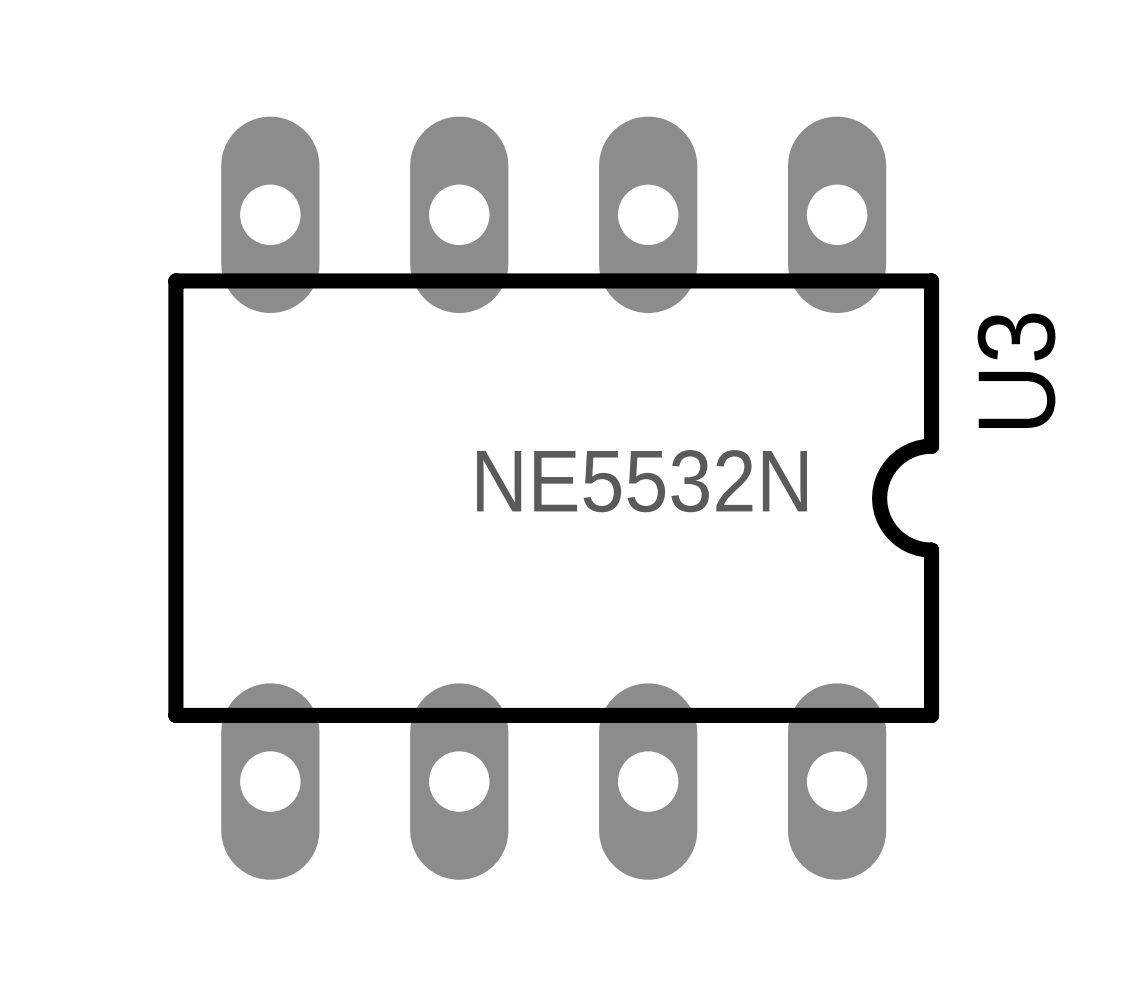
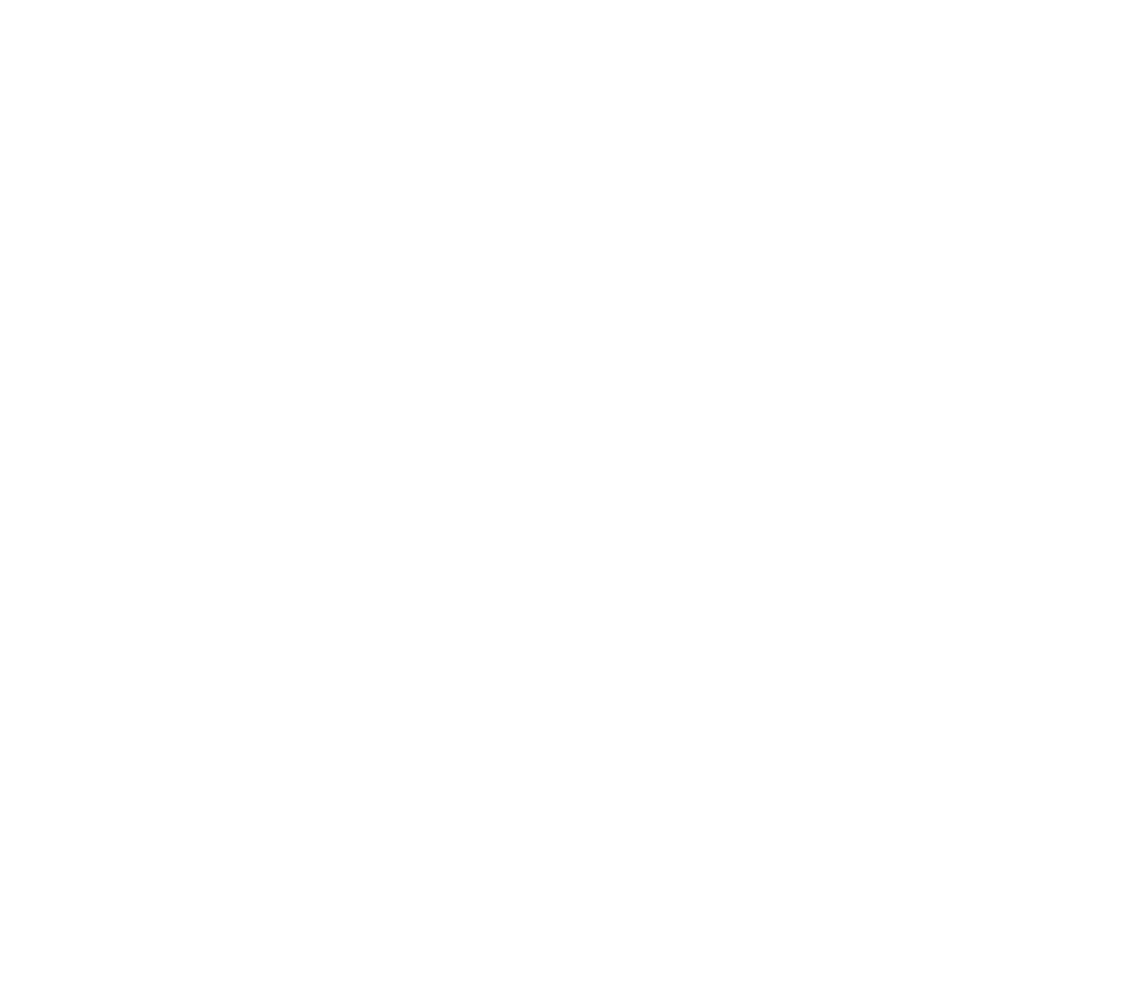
U3: NE5532N (553, 498) -> none

